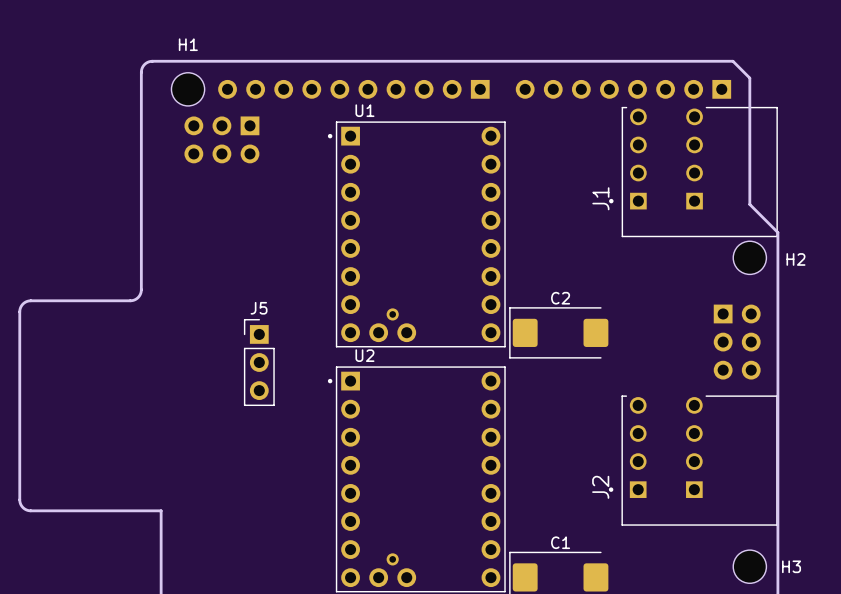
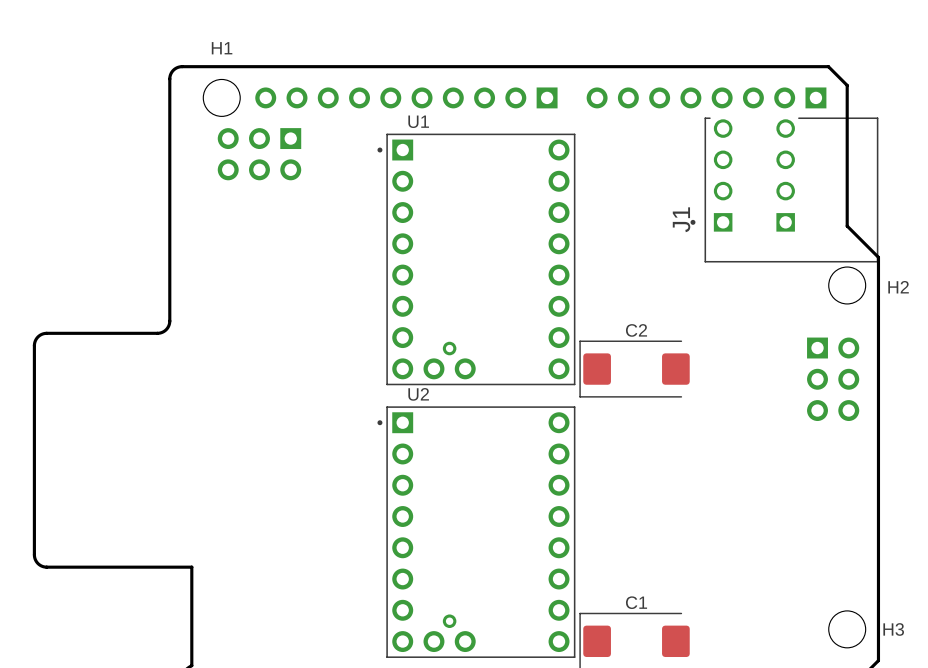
J5: (259, 362) -> none
J2: (693, 460) -> none

